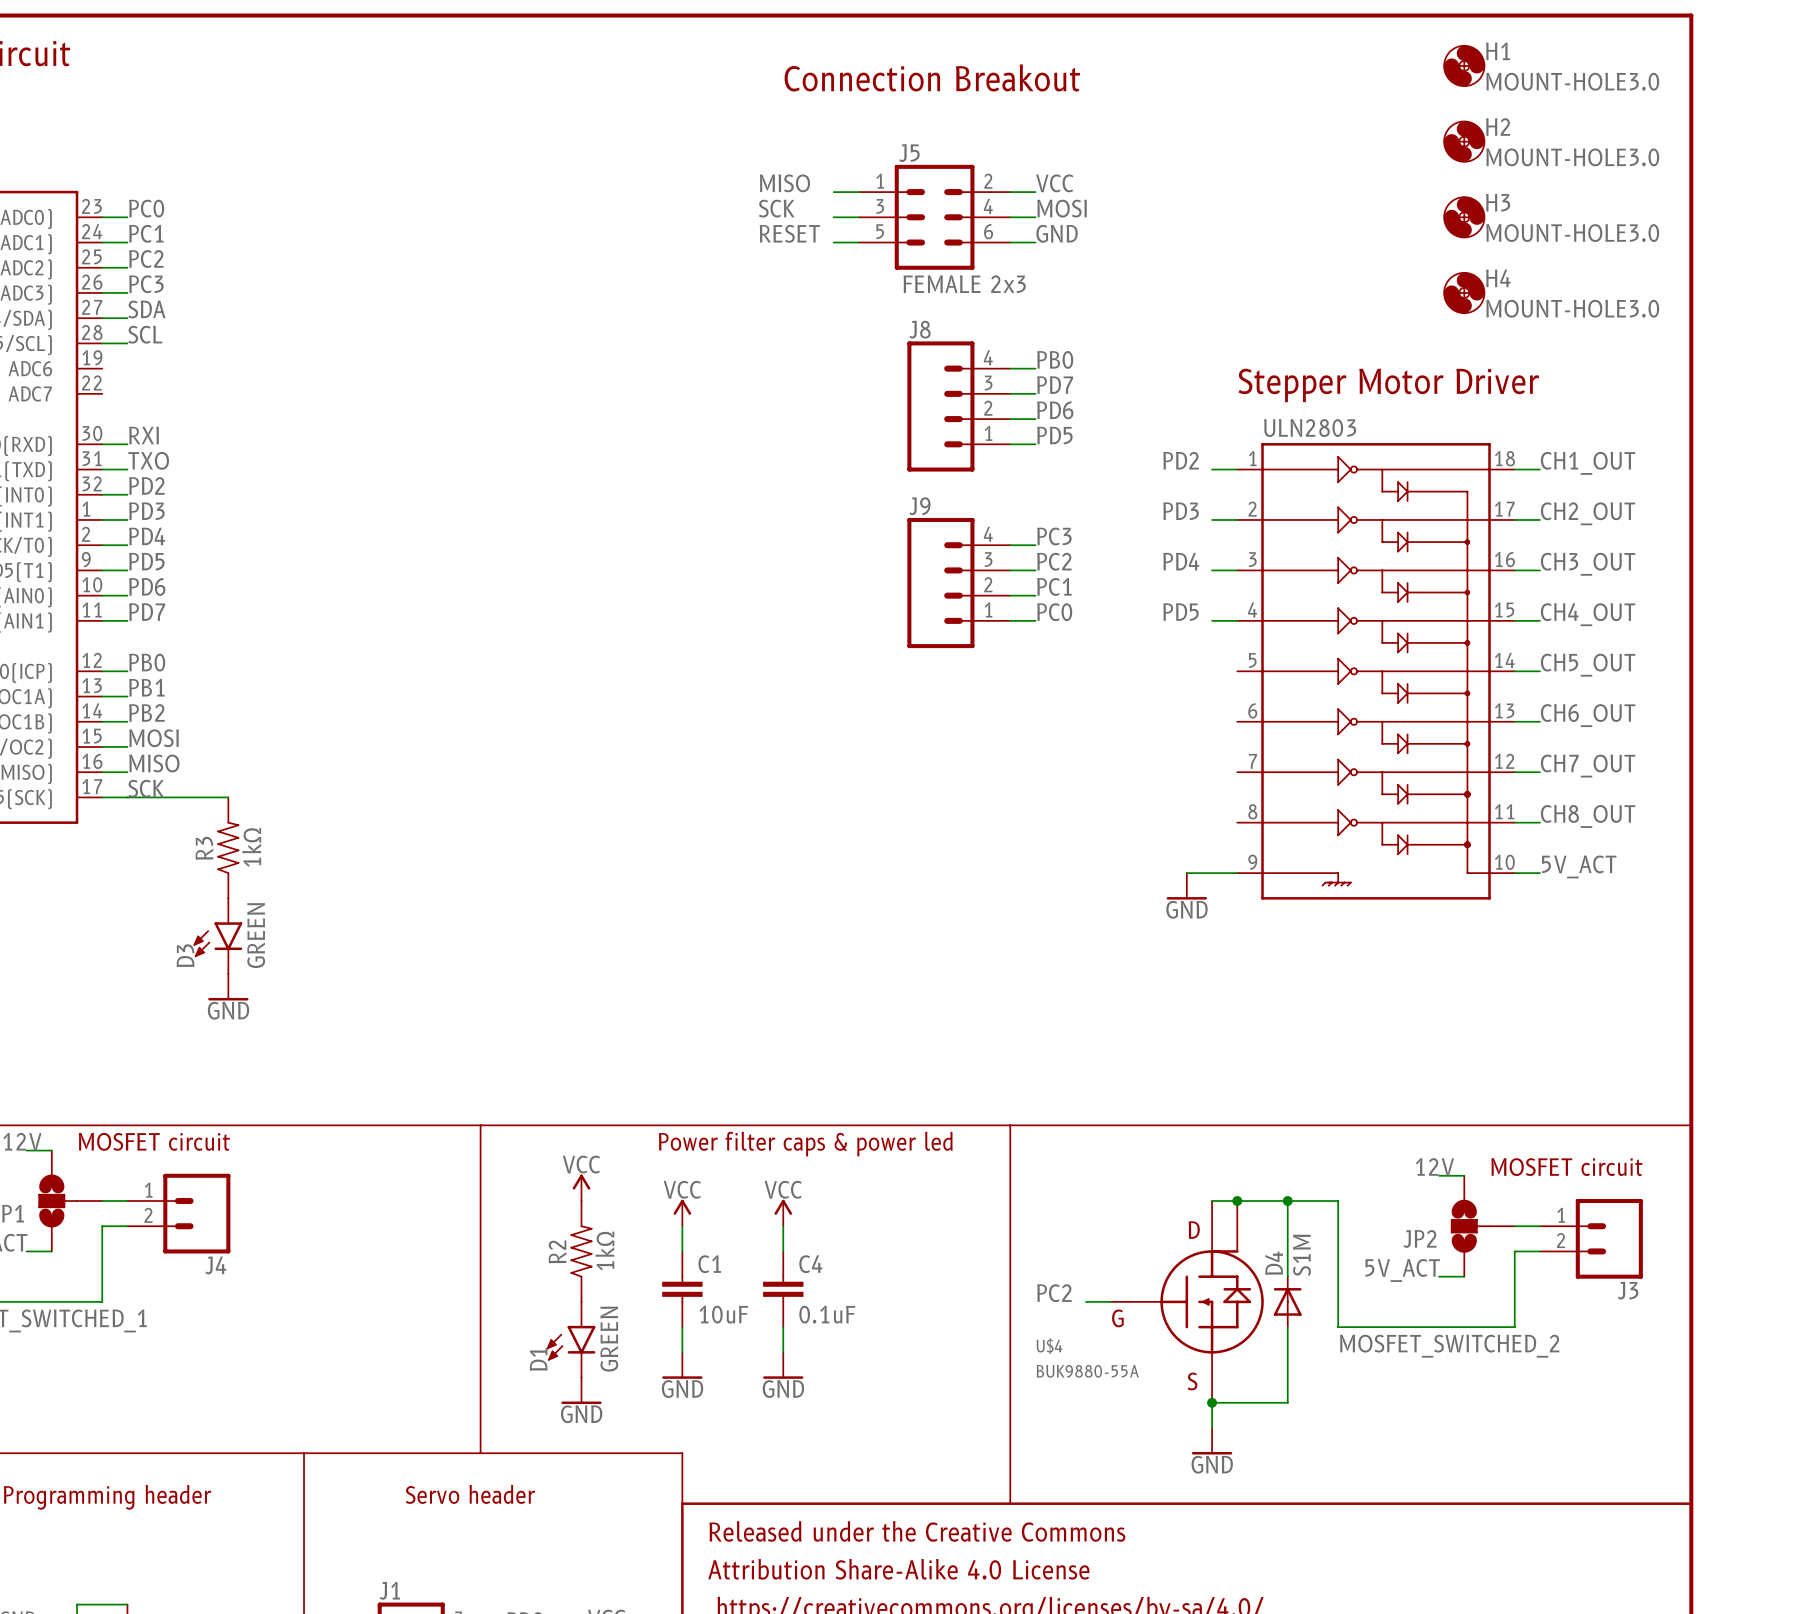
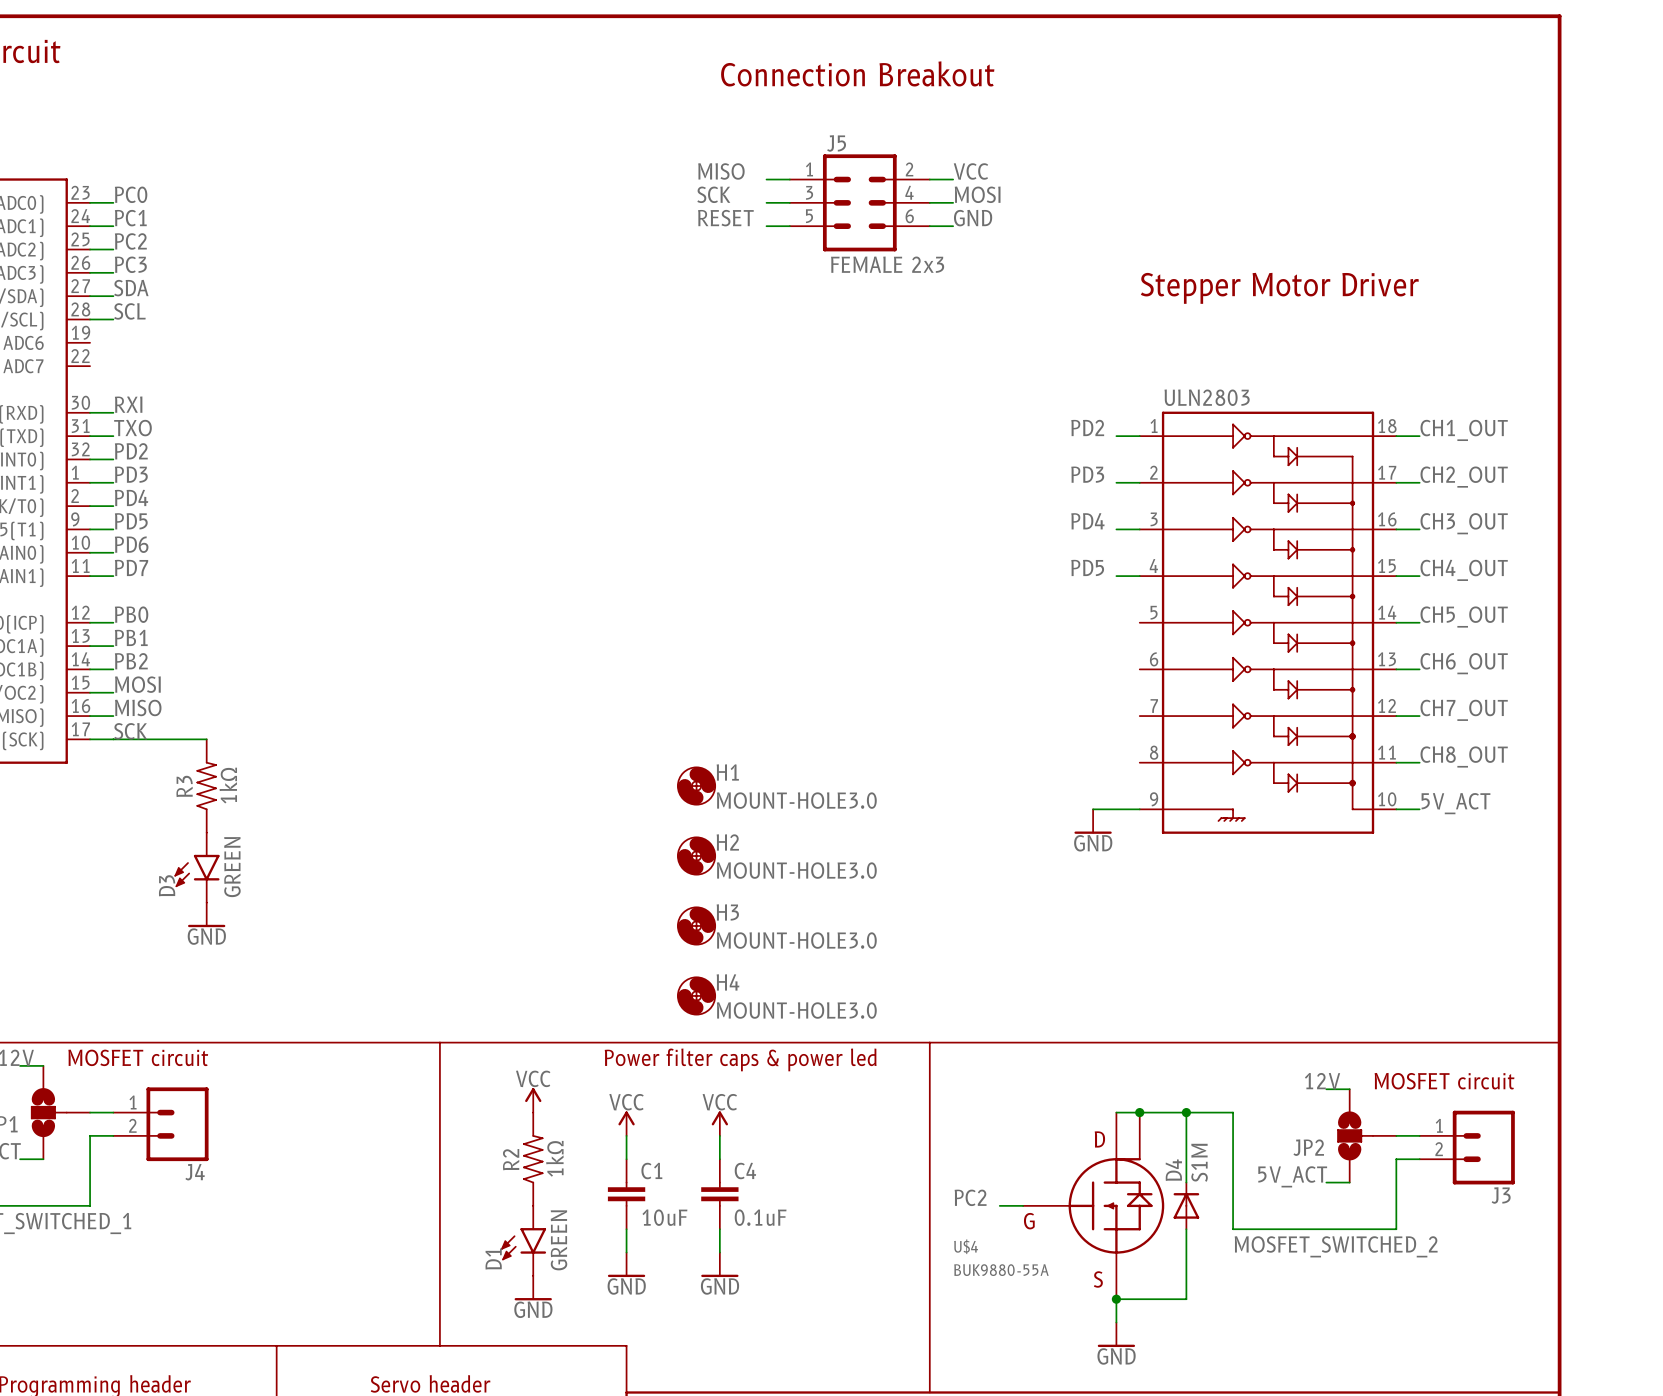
H1 position: (1464, 65) -> (696, 786)
H2 position: (1464, 141) -> (696, 856)
H3 position: (1464, 217) -> (696, 925)
H4 position: (1464, 292) -> (696, 995)
label: PB0 (1055, 359) -> none
wire: (1010, 368) (1035, 368) -> none
label: PD7 (1055, 385) -> none
text position: Stepper Motor Driver (1388, 385) -> Stepper Motor Driver (1279, 288)
wire: (1010, 393) (1035, 393) -> none
J8: (958, 406) -> none
label: PD6 (1055, 410) -> none
wire: (1010, 419) (1035, 419) -> none
label: PD5 (1054, 435) -> none
wire: (1010, 444) (1035, 444) -> none
label: PC3 (1054, 536) -> none
wire: (1010, 545) (1035, 545) -> none
label: PC2 (1054, 561) -> none
wire: (1010, 570) (1035, 570) -> none
J9: (958, 583) -> none
label: PC1 (1054, 586) -> none
wire: (1010, 595) (1035, 595) -> none
label: PC0 (1054, 612) -> none
wire: (1010, 620) (1035, 620) -> none

